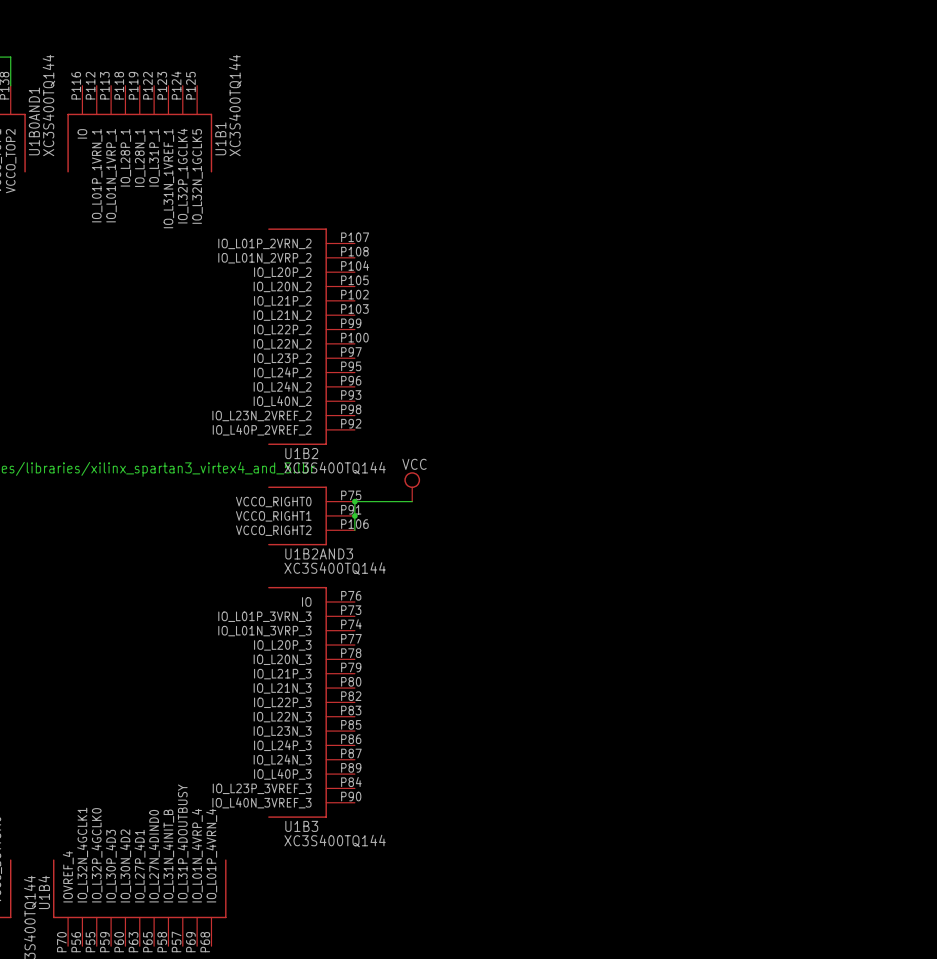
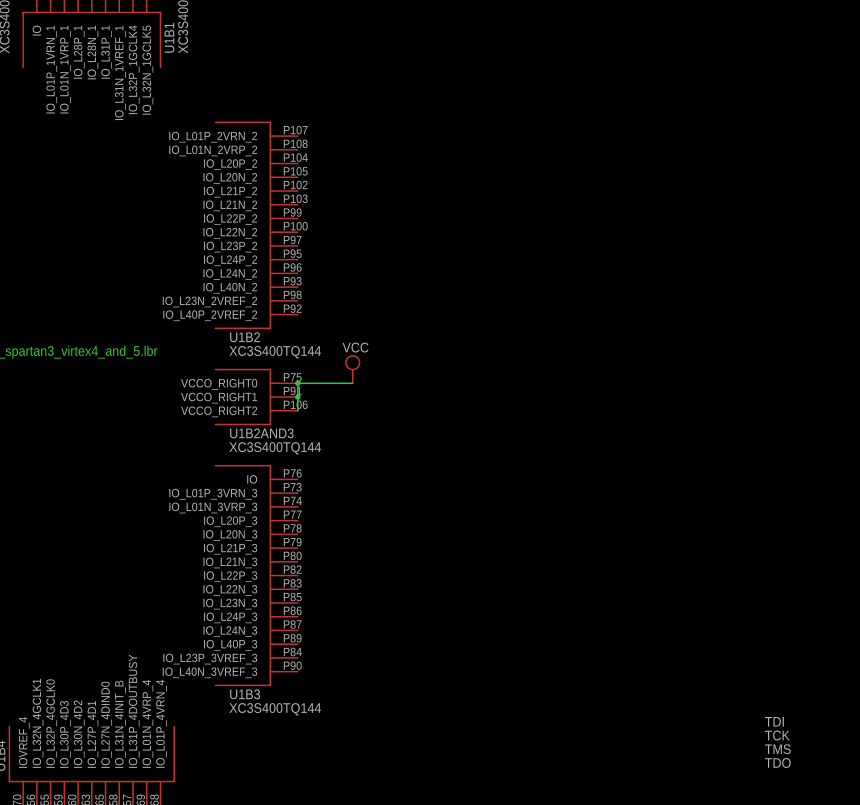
label: none -> TDI (774, 721)
label: none -> TCK (777, 735)
label: none -> TMS (777, 749)
label: none -> TDO (777, 762)

